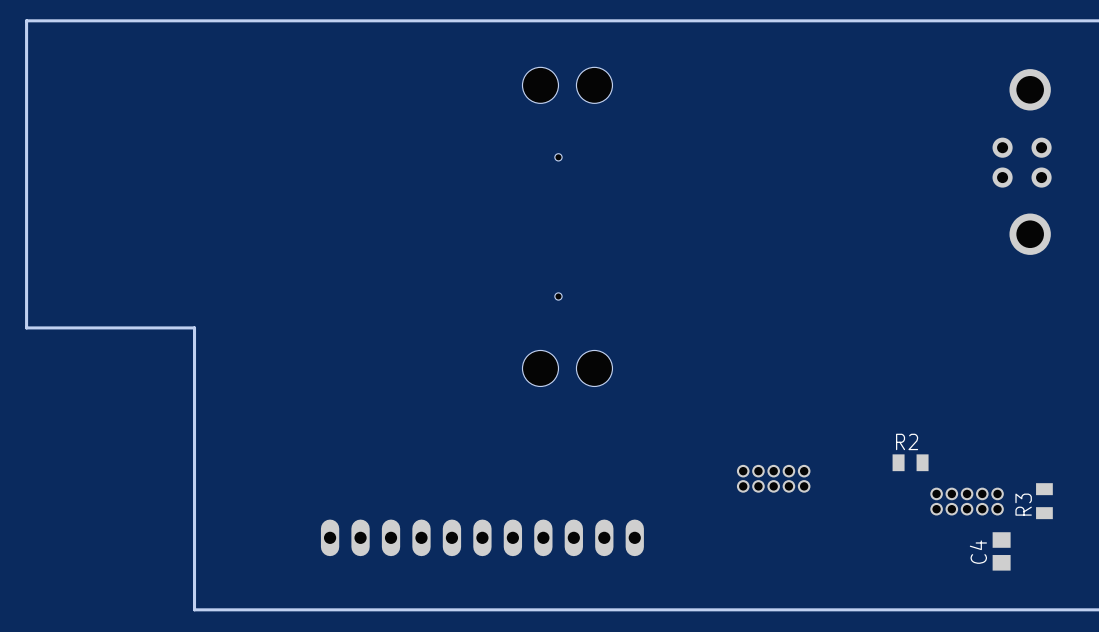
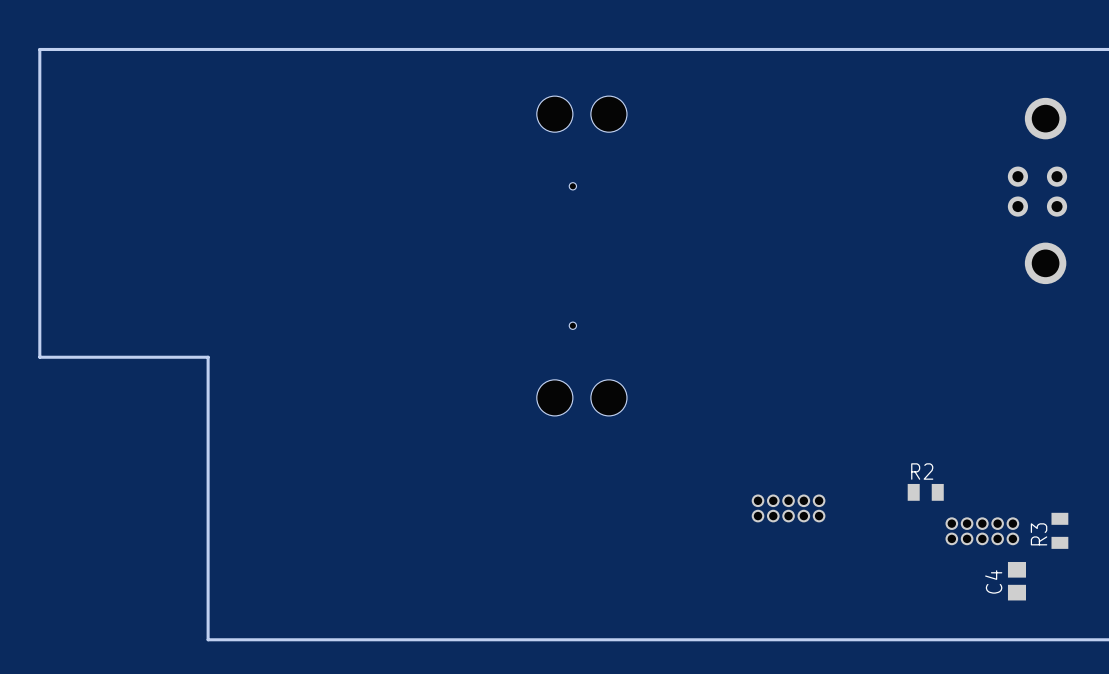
part: (482, 537) -> none

